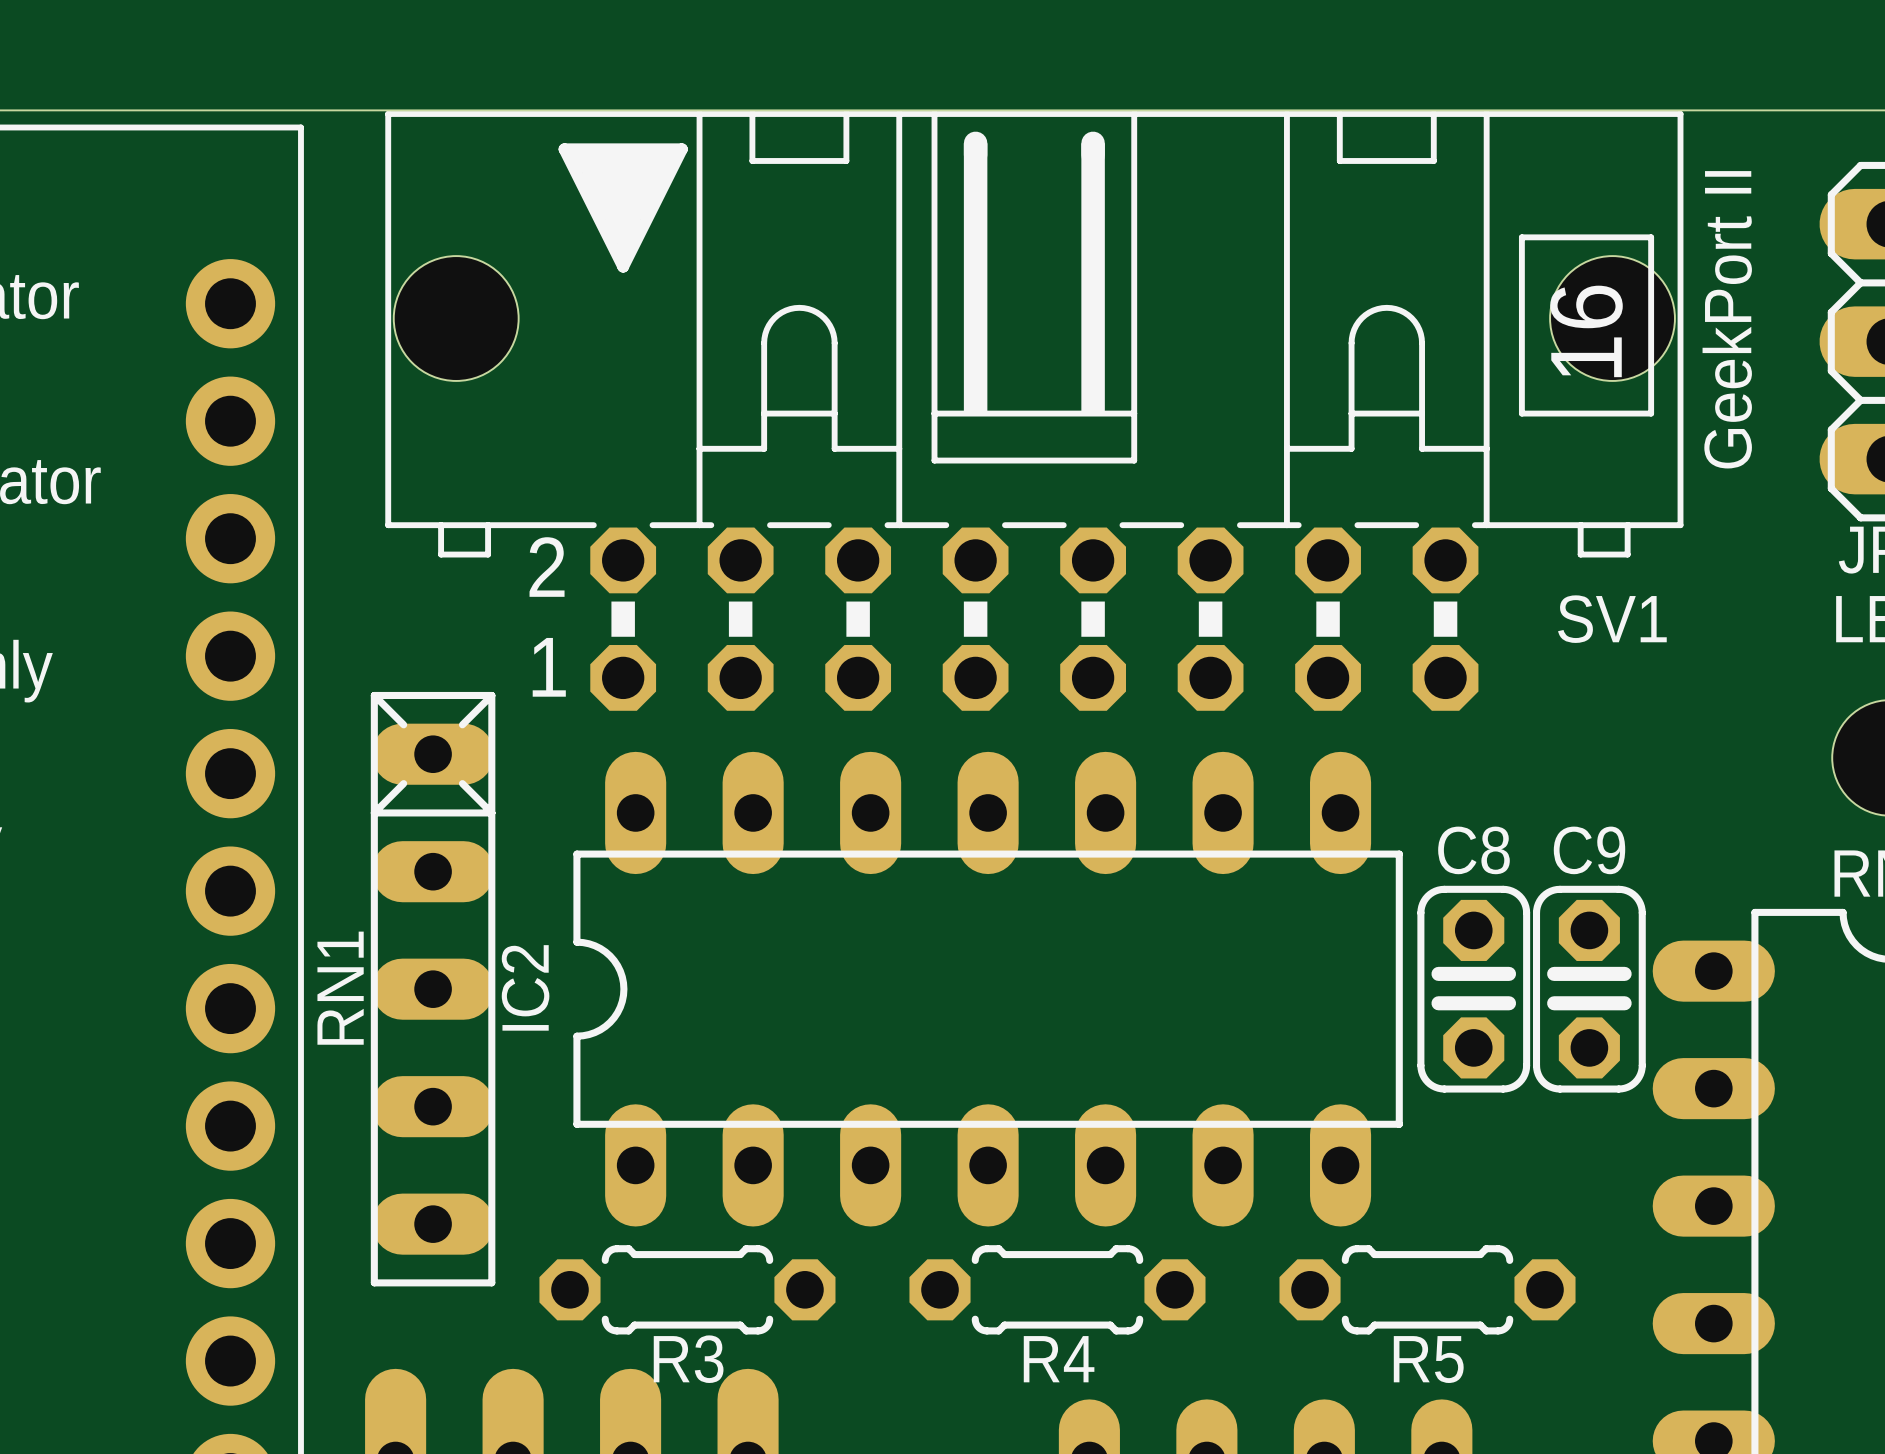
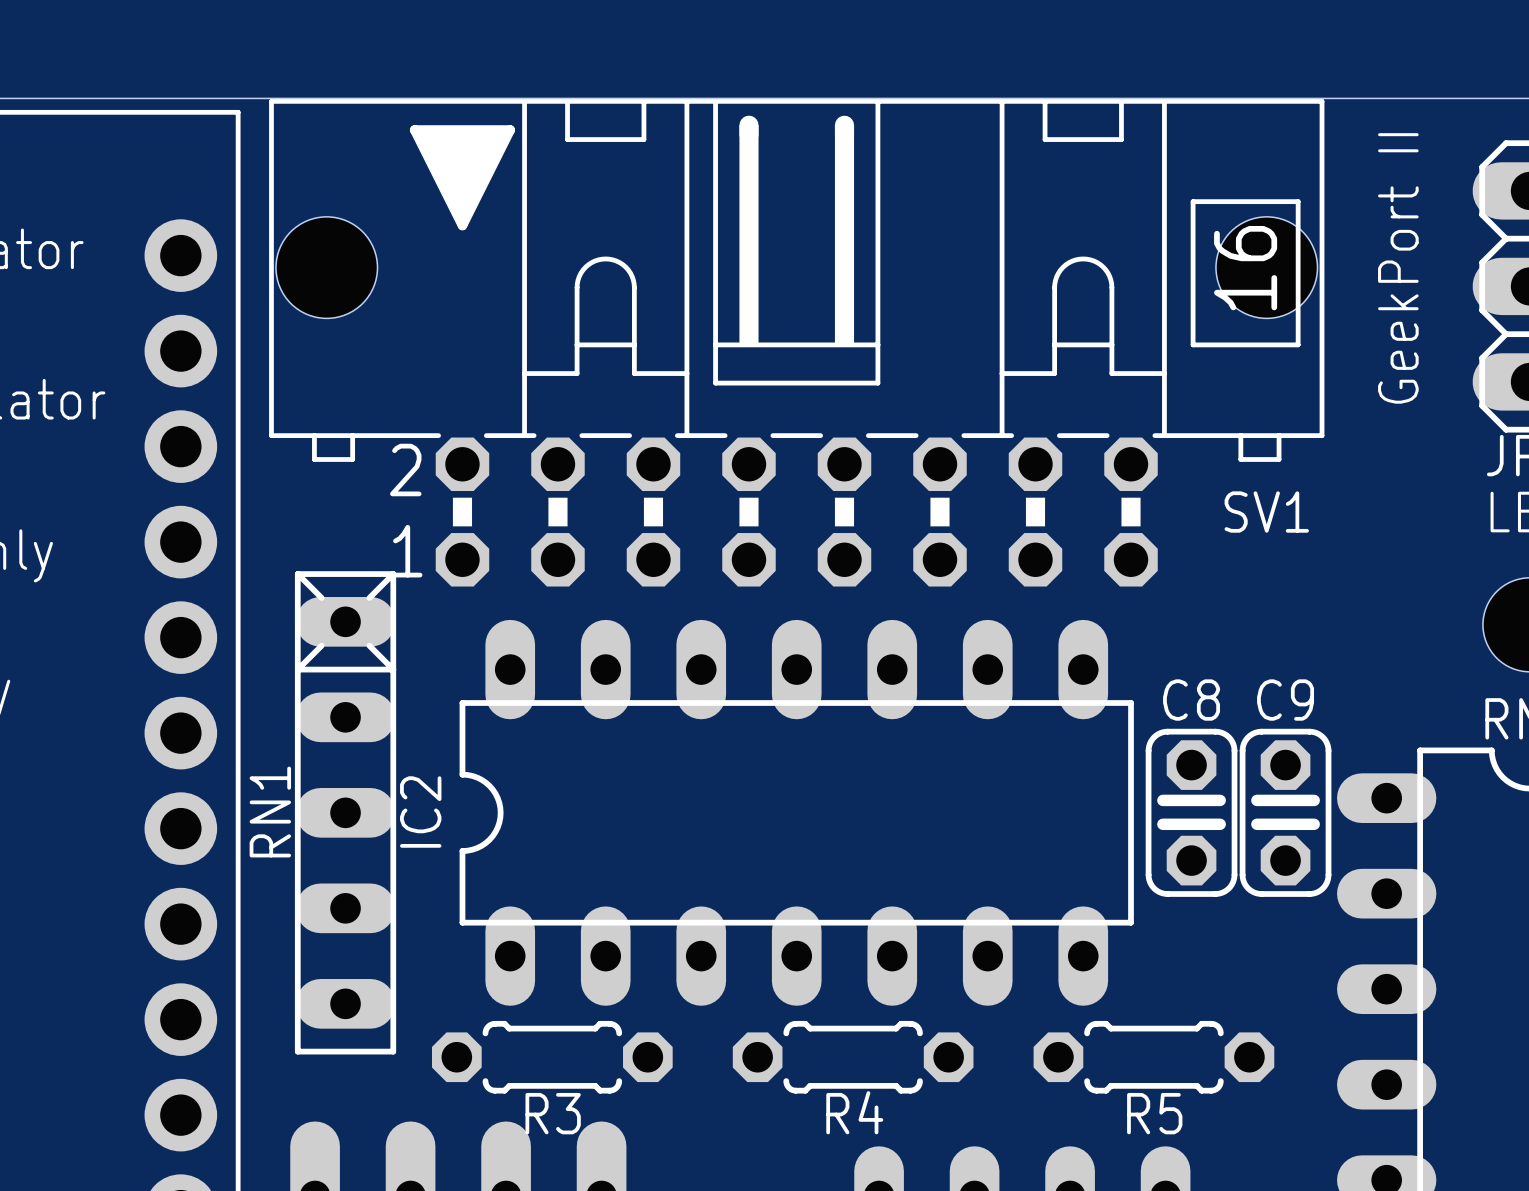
hole position: (456, 318) -> (326, 267)
hole position: (1612, 318) -> (1266, 267)
SV1 position: (1034, 410) -> (796, 342)

